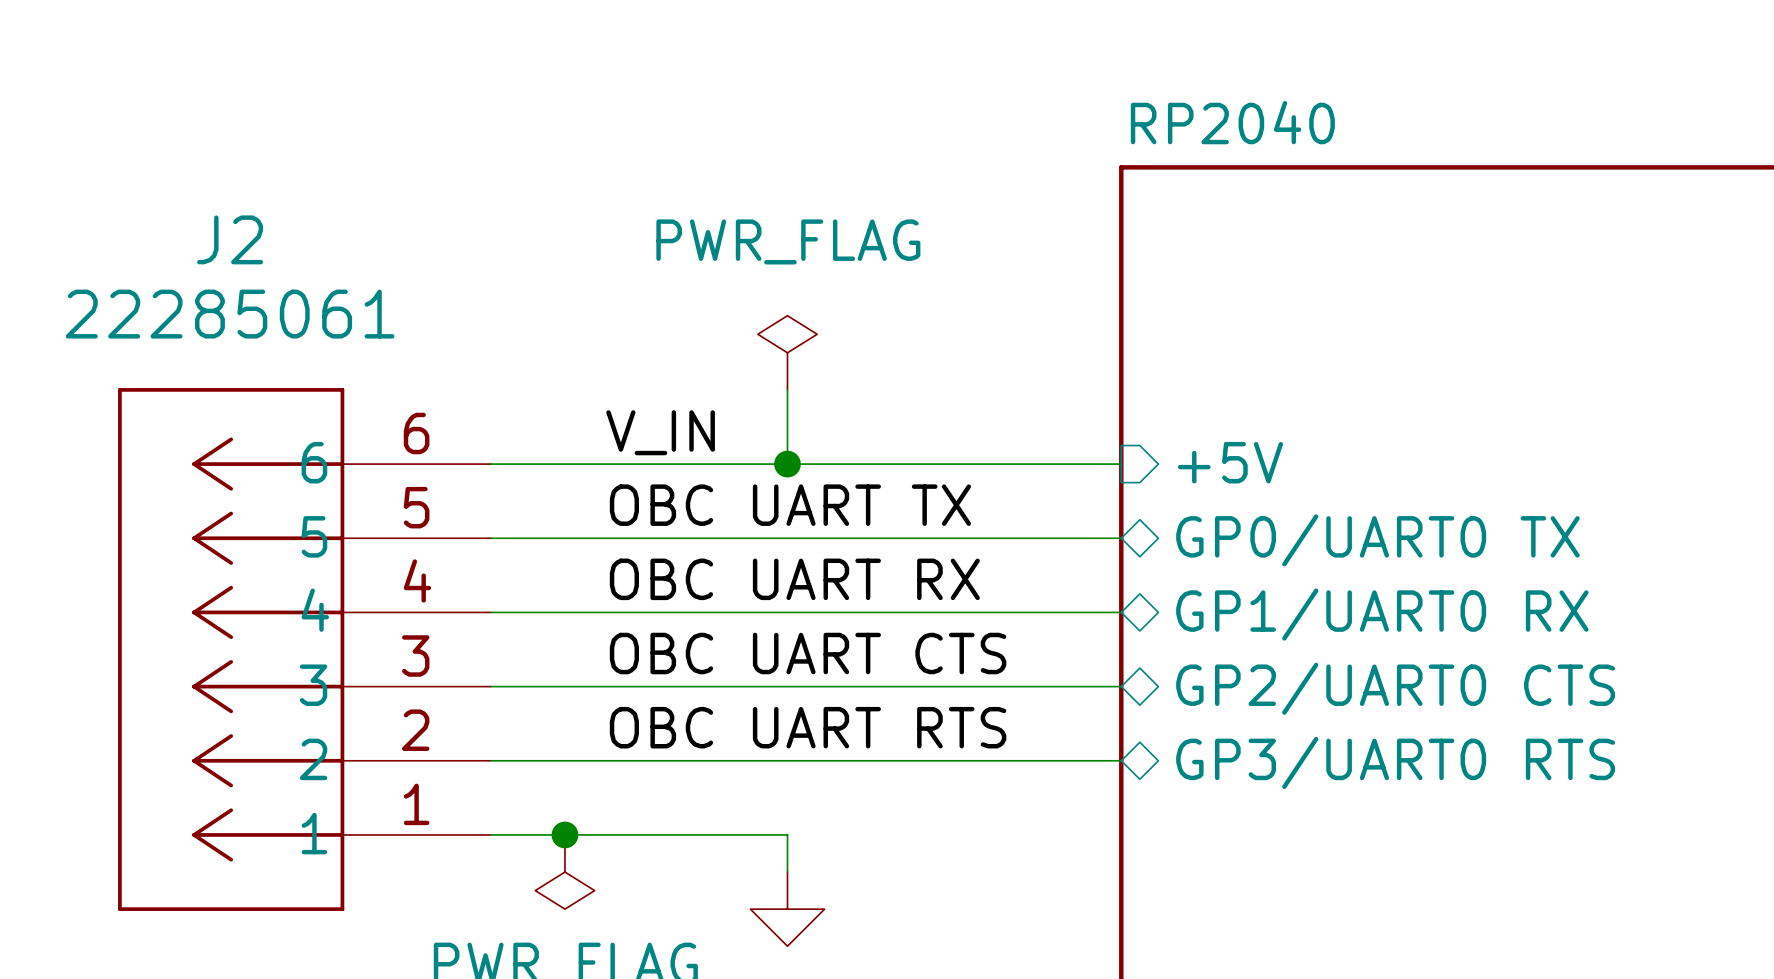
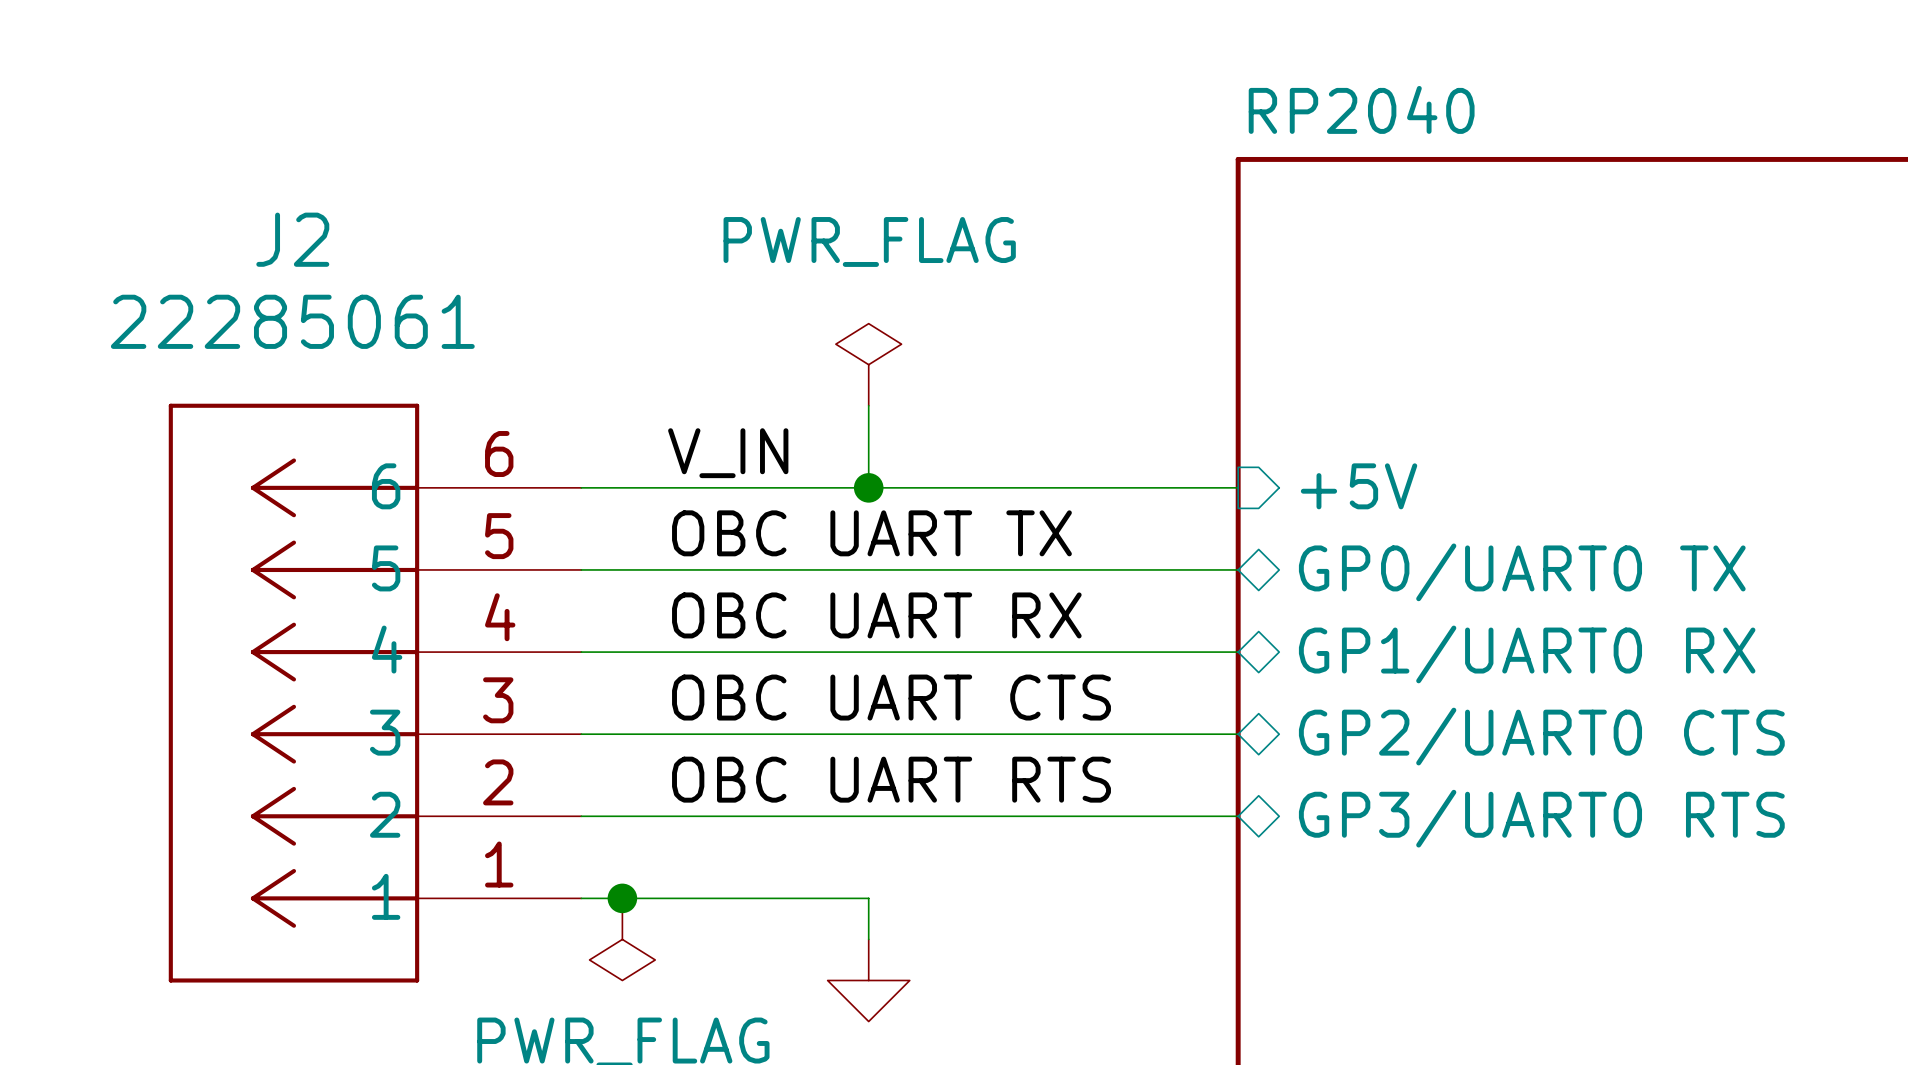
J2 position: (304, 649) -> (375, 693)

